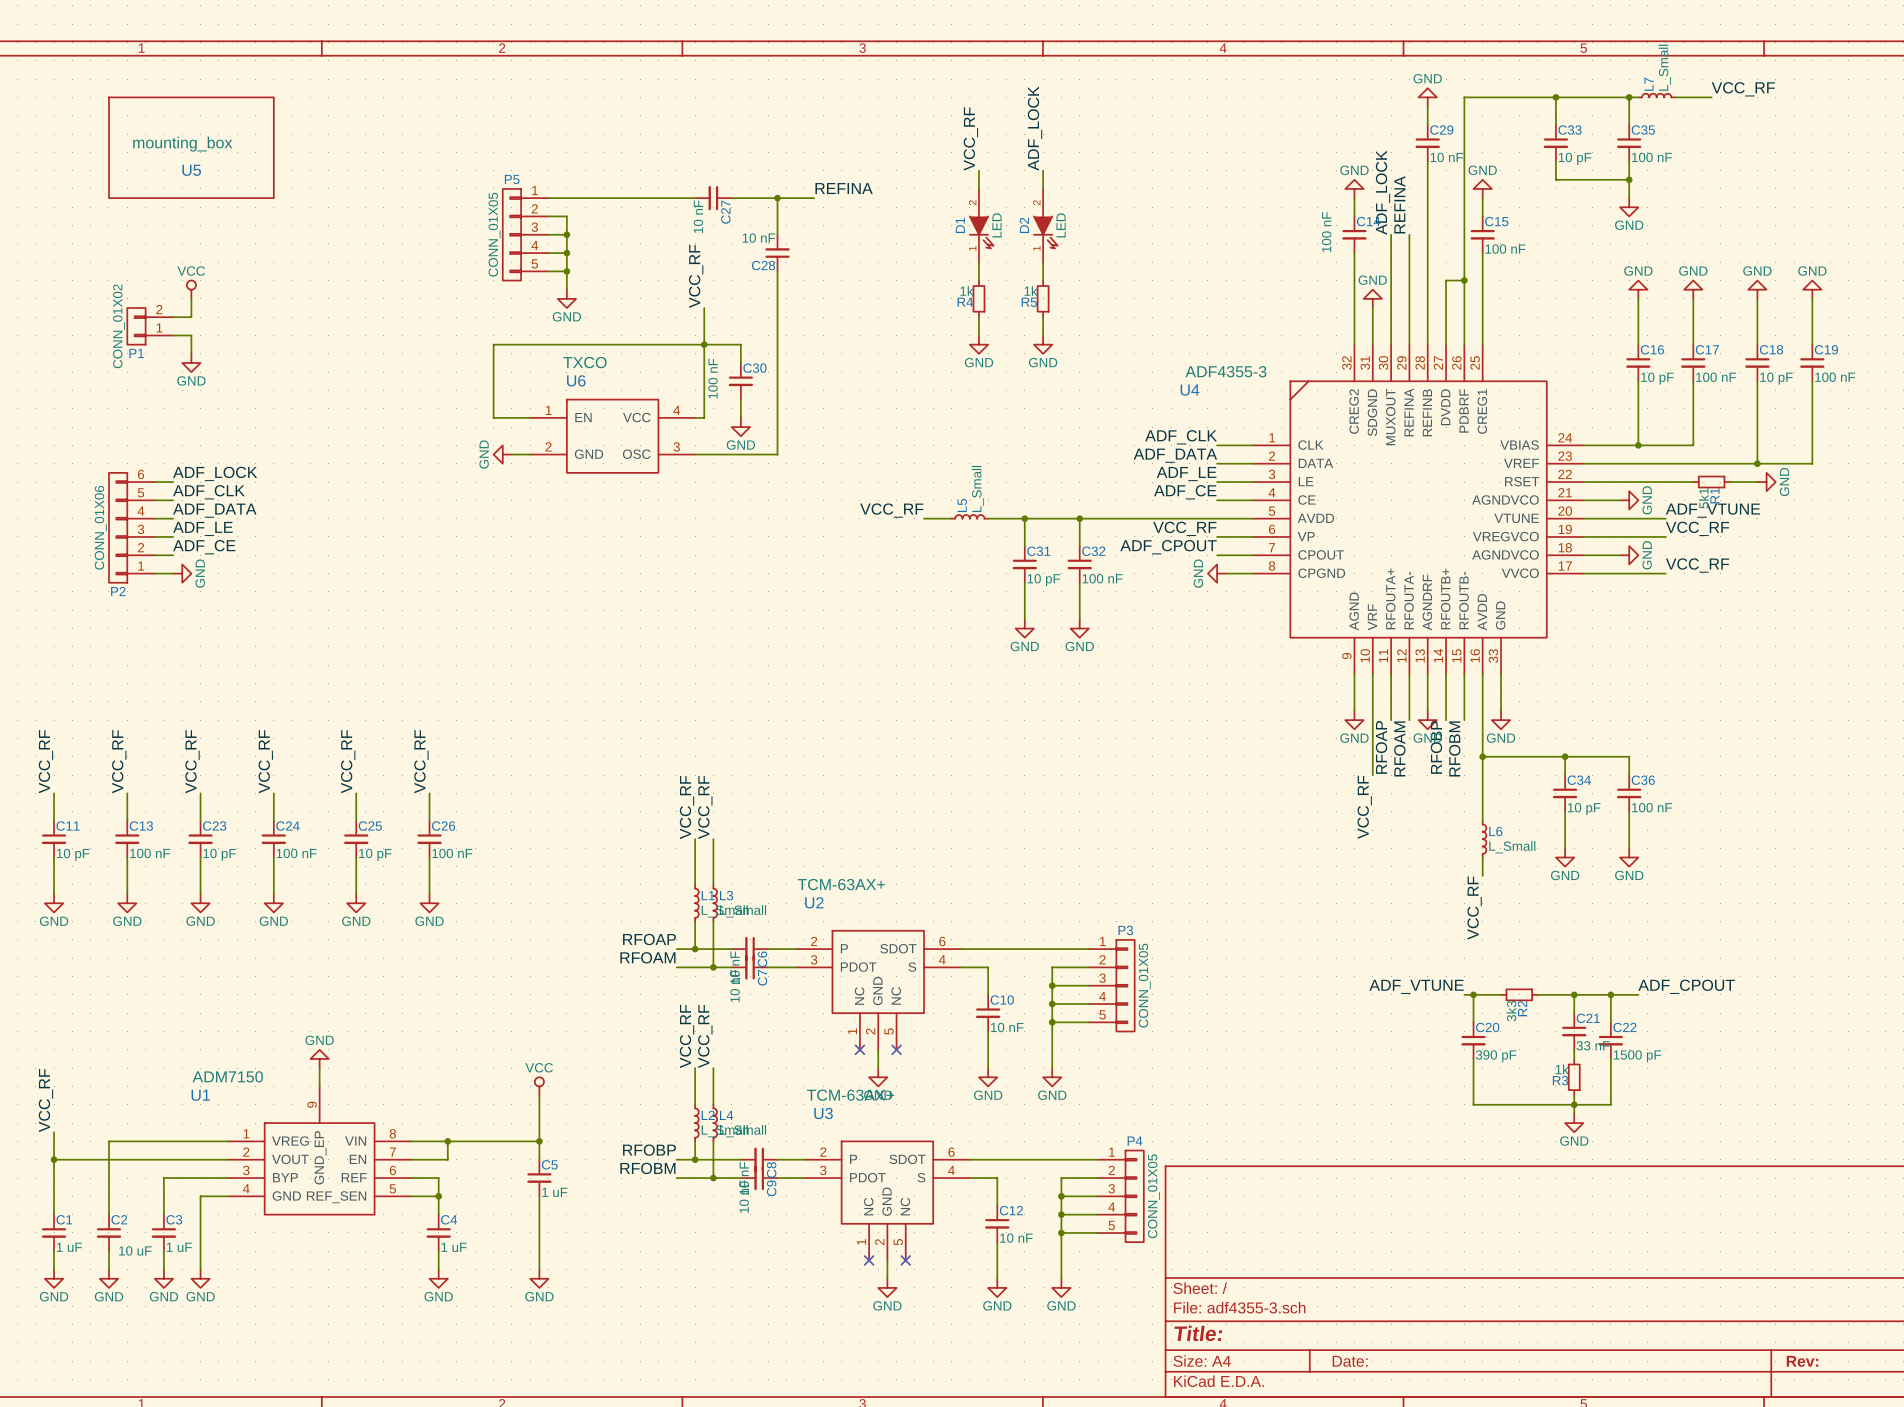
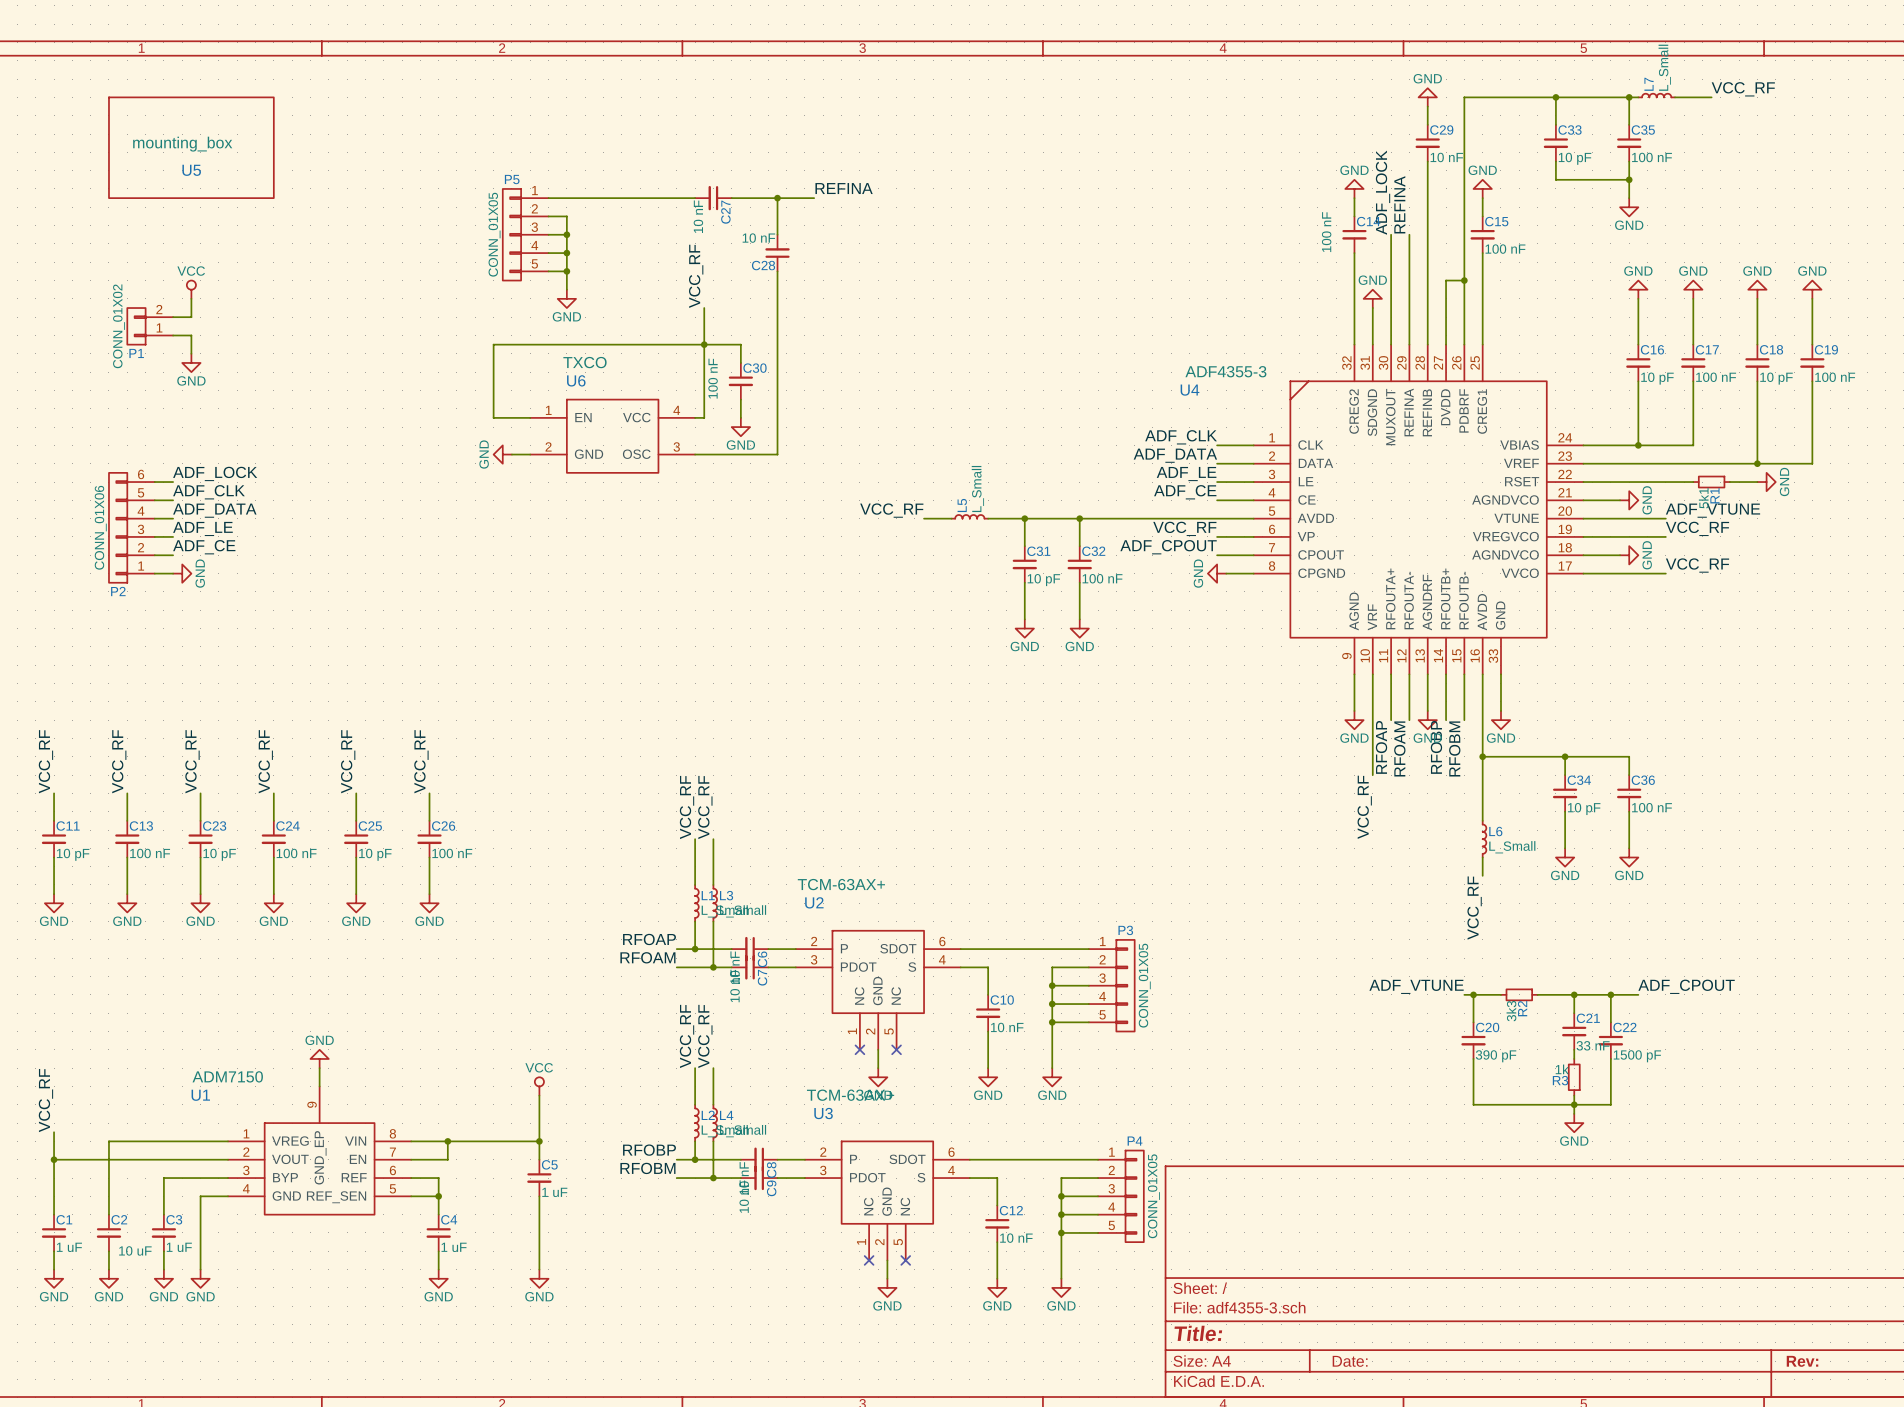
label: ADF_LOCK (1035, 128) -> none
label: VCC_RF (970, 138) -> none
wire: (978, 170) (978, 188) -> none
wire: (1043, 170) (1043, 188) -> none
D1: LED (981, 225) -> none
D2: LED (1045, 225) -> none
wire: (978, 262) (978, 280) -> none
wire: (1043, 262) (1043, 280) -> none
R4: 1k (978, 298) -> none
R5: 1k (1043, 298) -> none
wire: (978, 317) (978, 335) -> none
wire: (1043, 317) (1043, 335) -> none
power symbol: GND (978, 344) -> none
power symbol: GND (1043, 344) -> none

